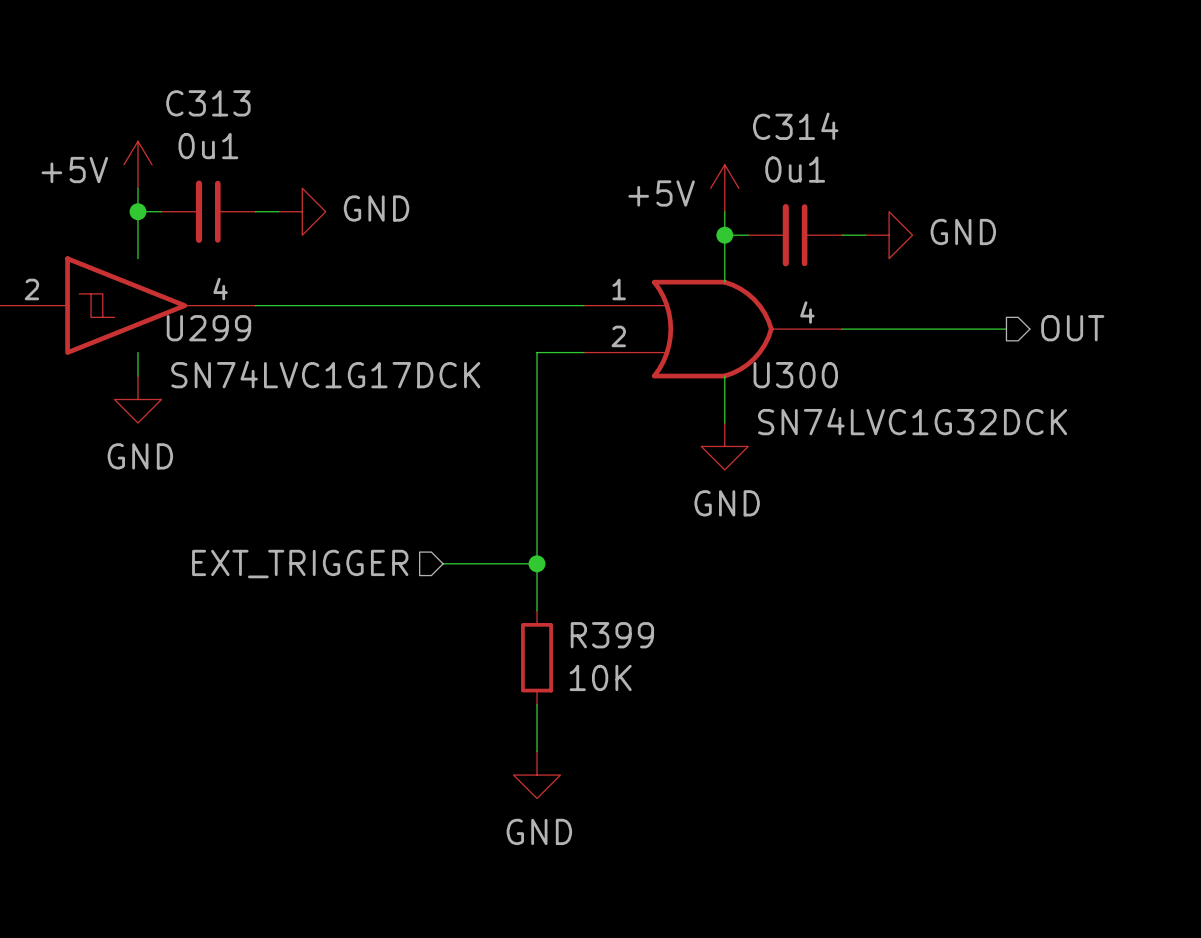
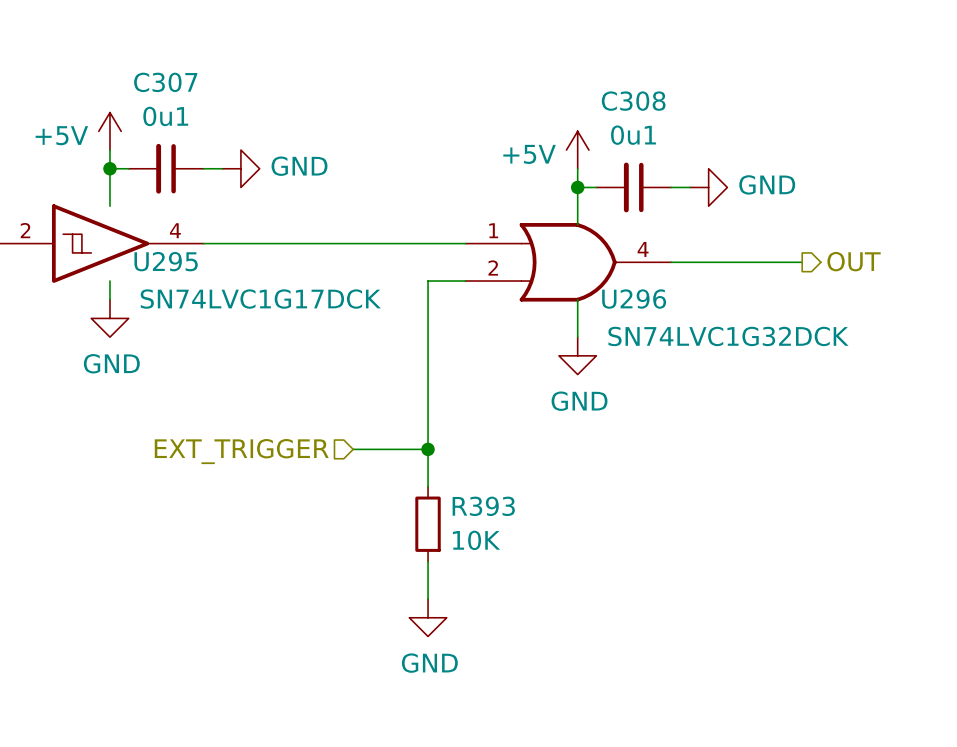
C313 name: C313 (208, 103) -> C307 (165, 82)
C314 name: C314 (795, 126) -> C308 (633, 101)
U299 name: U299 (208, 328) -> U295 (166, 261)
U300 name: U300 (795, 375) -> U296 (634, 299)
R399 name: R399 (612, 635) -> R393 (483, 506)

